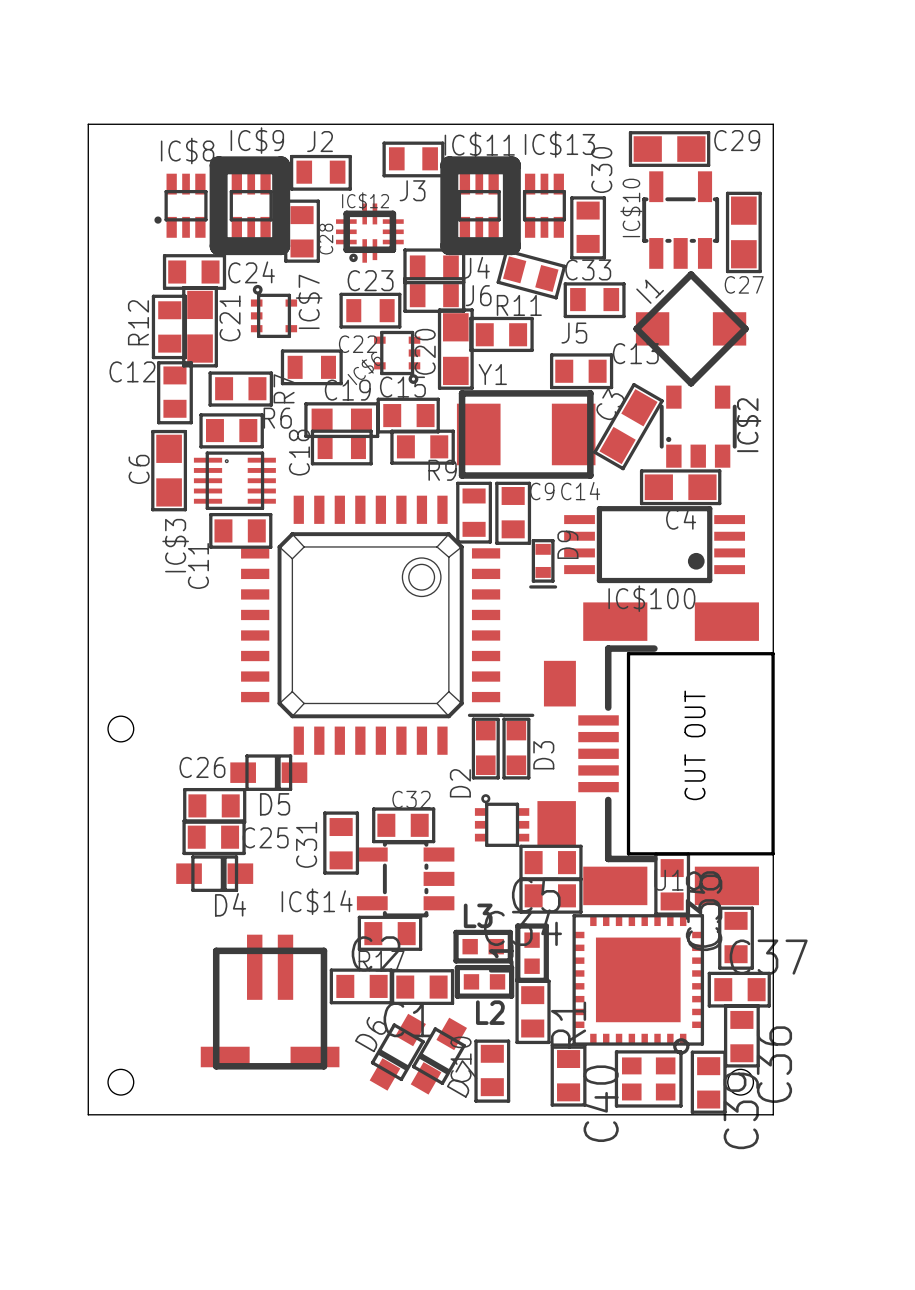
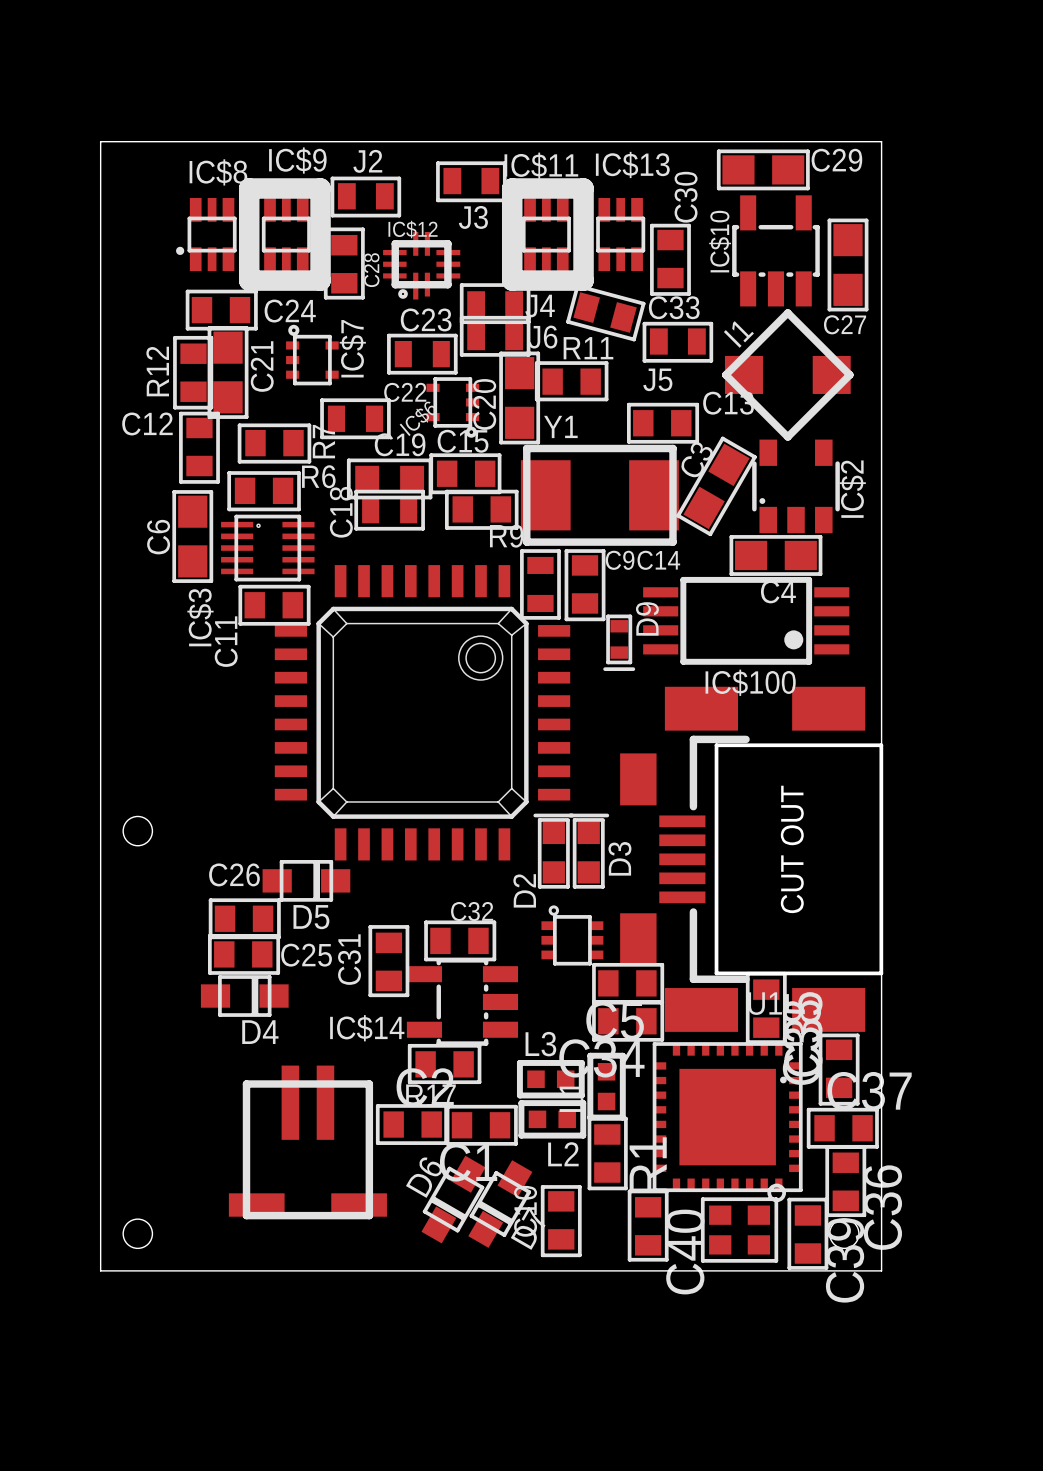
U1 footprint: [537, 602, 775, 906] -> [620, 686, 884, 1032]
part footprint: [572, 914, 705, 1046] -> [652, 1042, 803, 1193]

